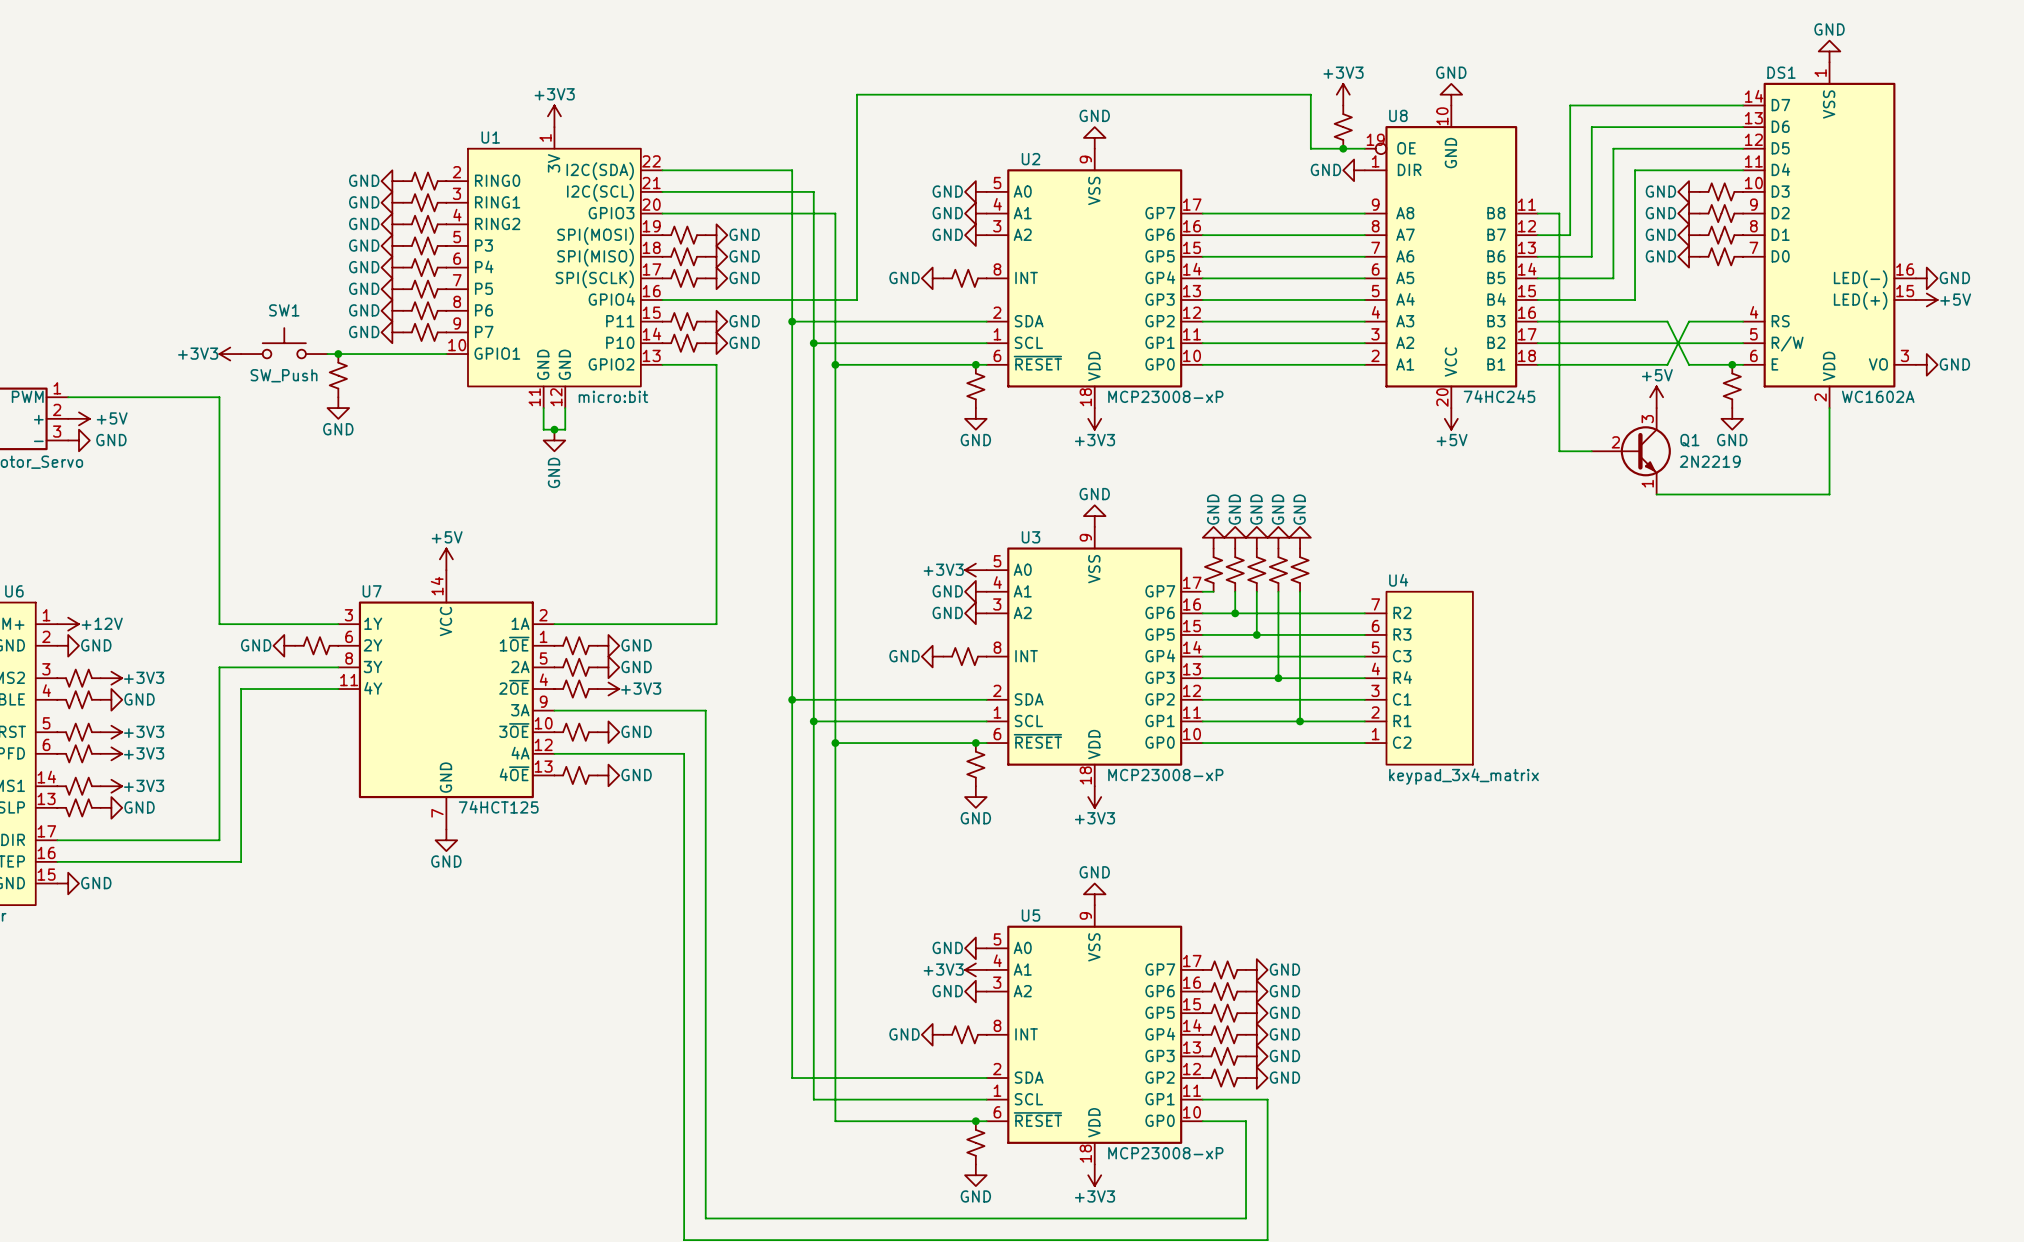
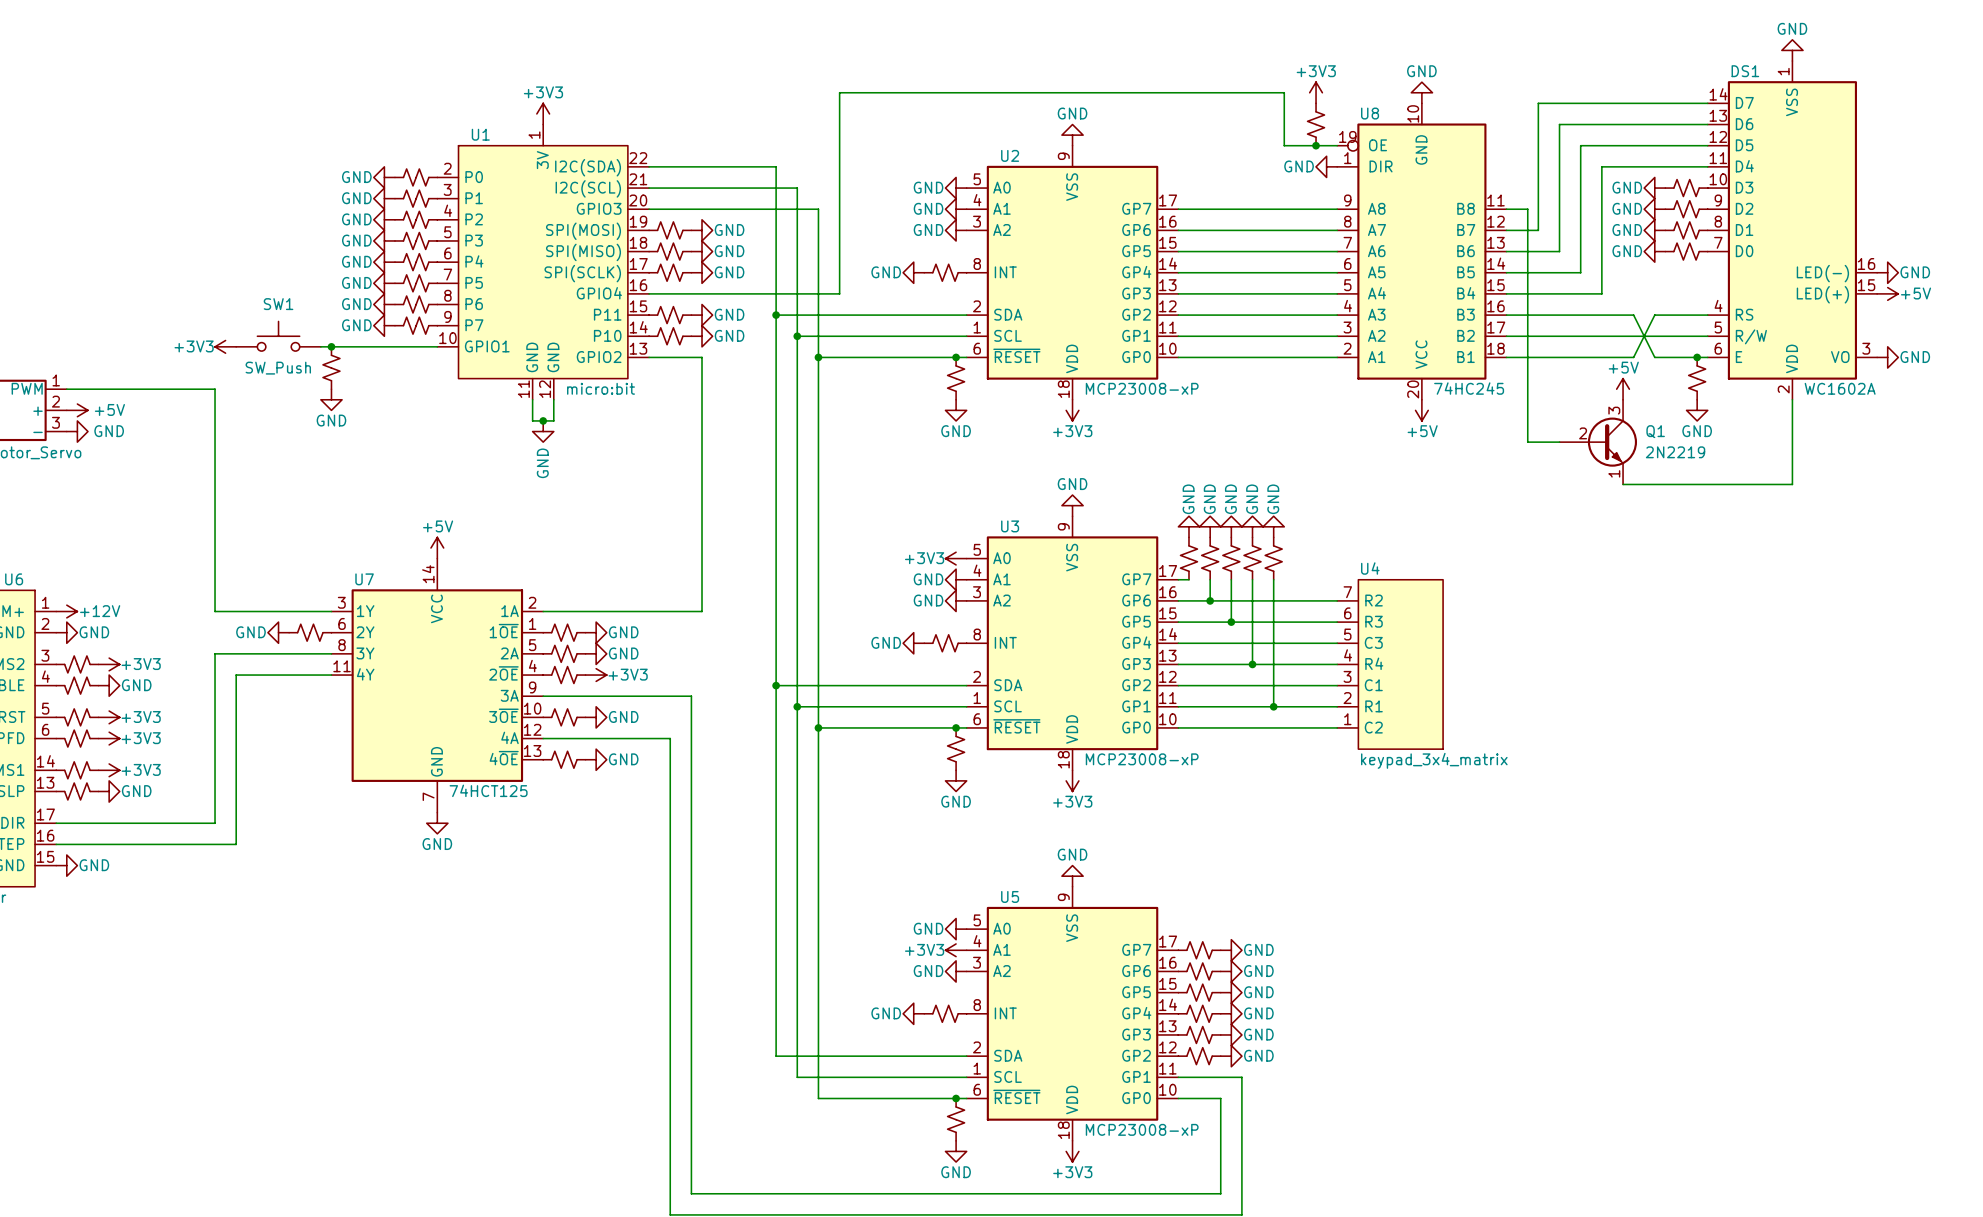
U1 pin name: RING0 (497, 180) -> P0 (474, 177)
U1 pin name: RING1 (497, 202) -> P1 (474, 198)
U1 pin name: RING2 (497, 223) -> P2 (474, 219)

